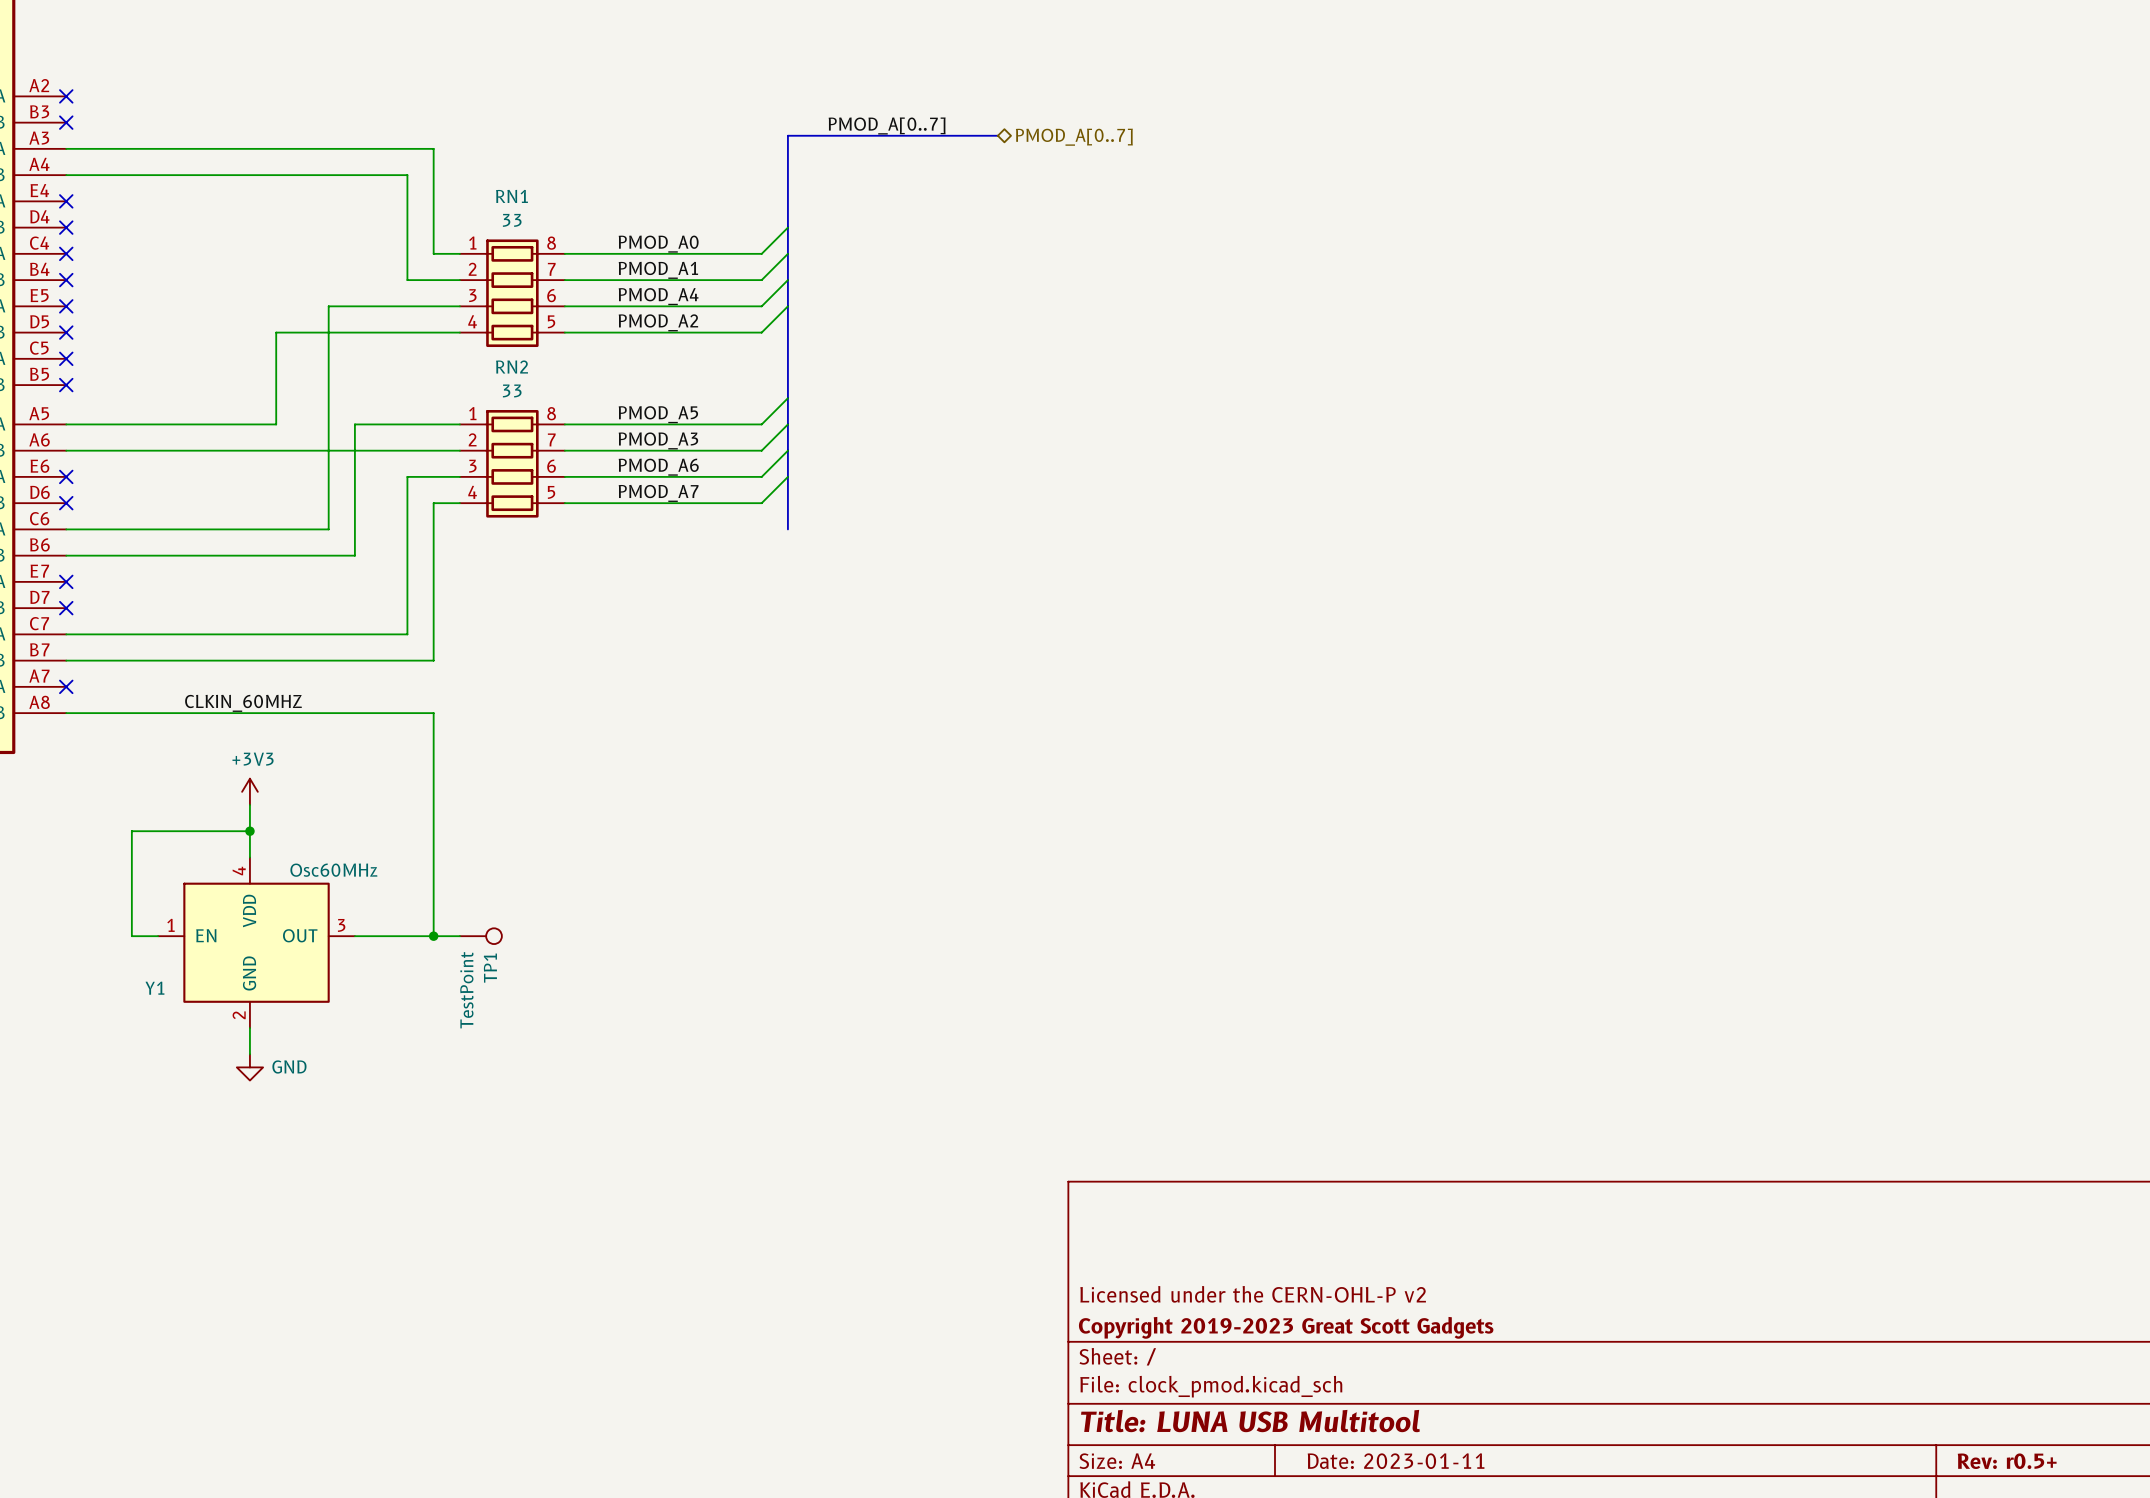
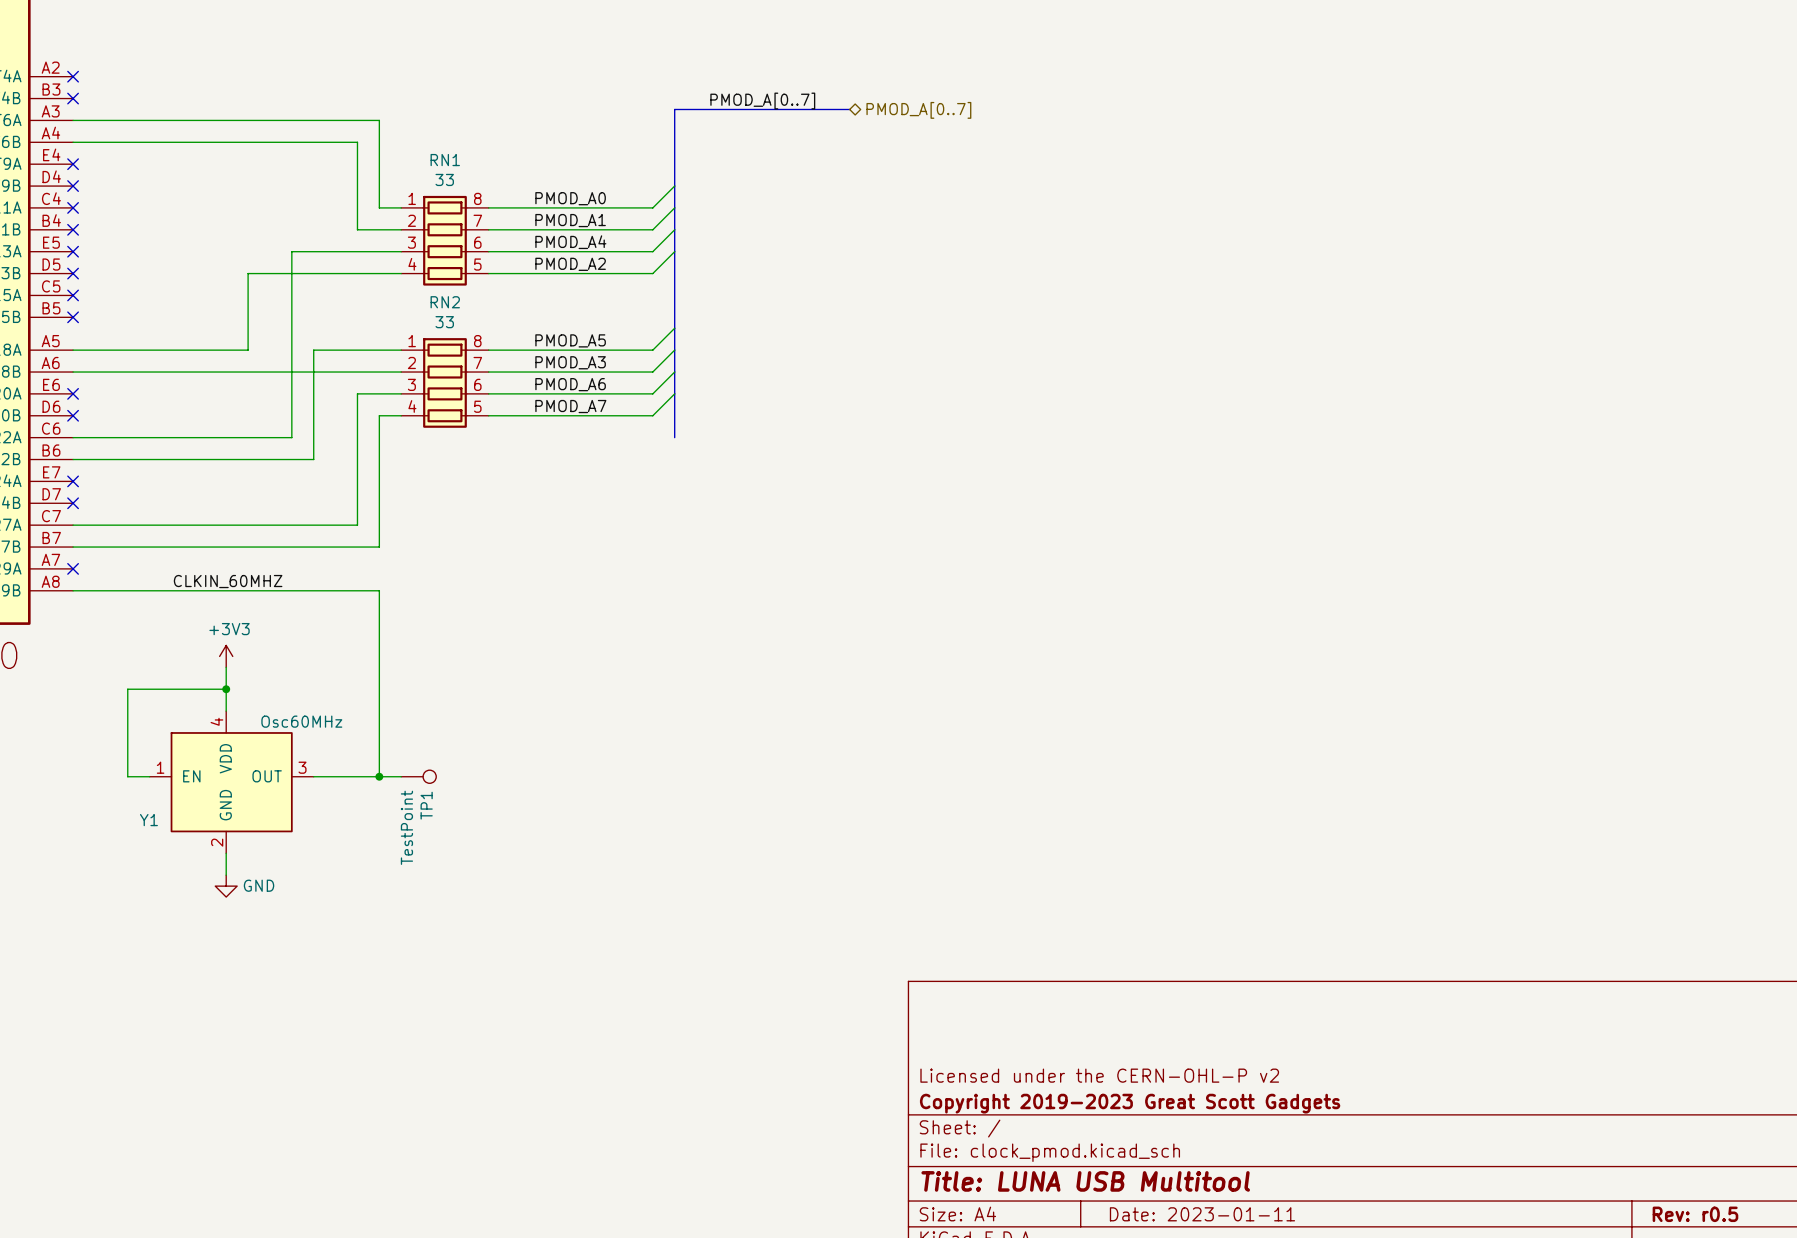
title block: Rev: r0.5+ (2007, 1461) -> Rev: r0.5 (1695, 1214)

